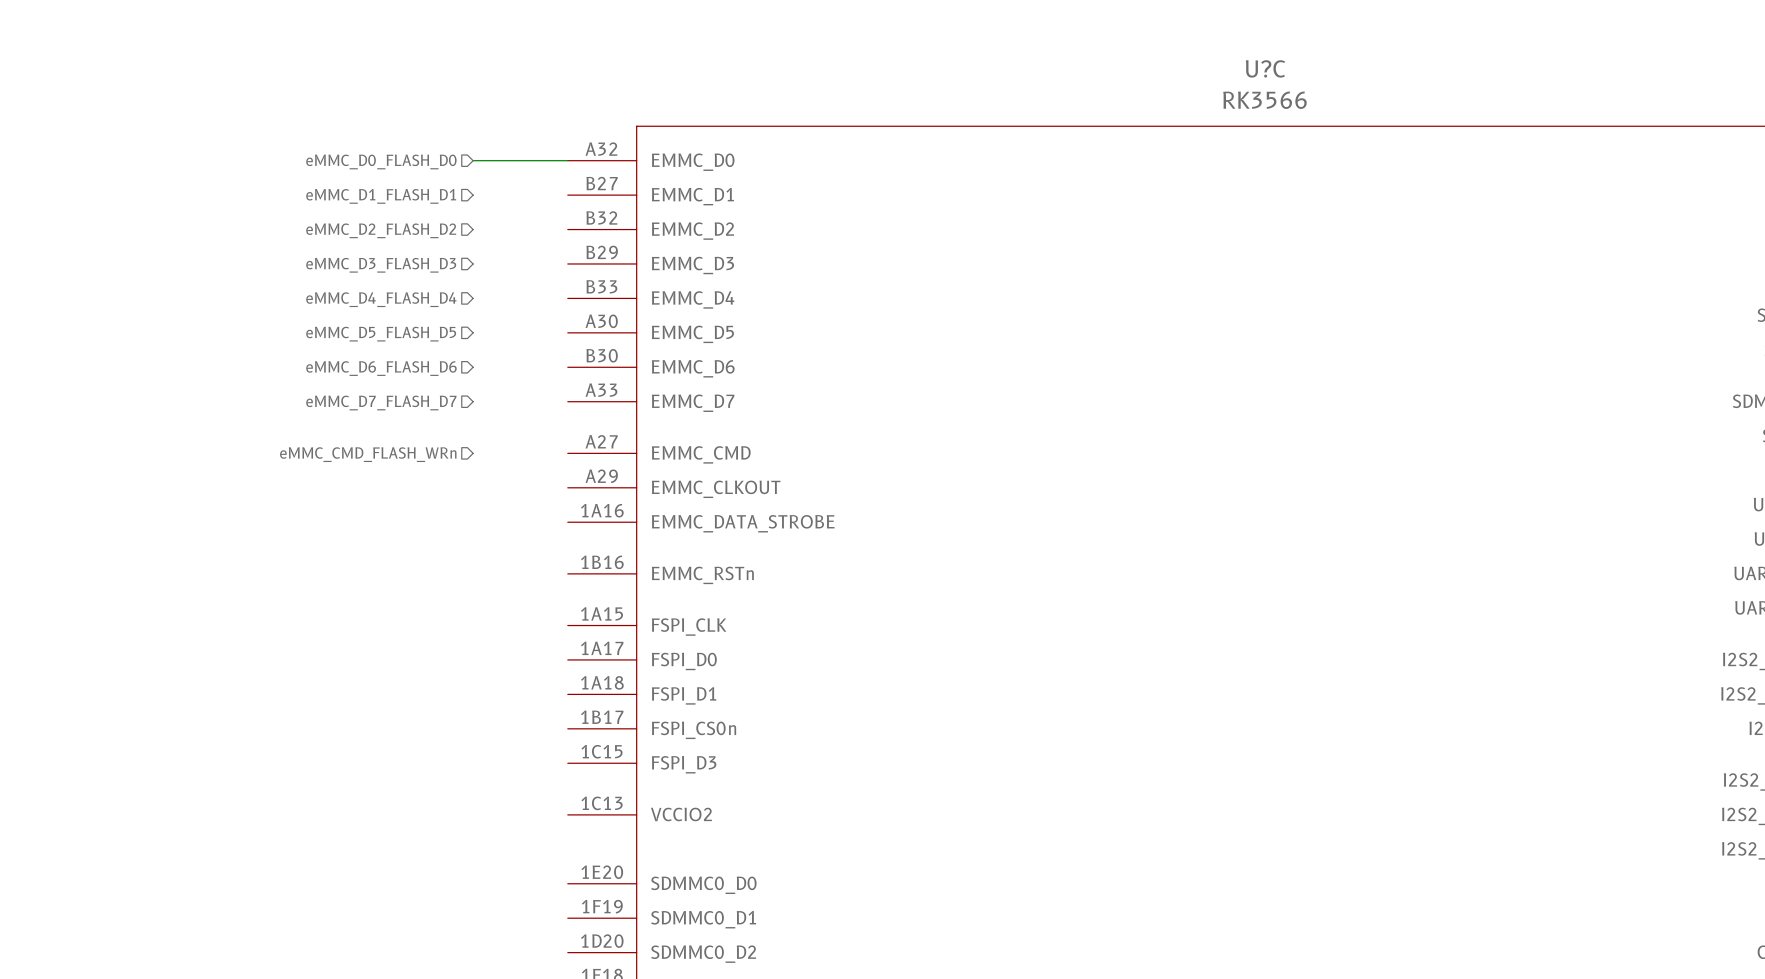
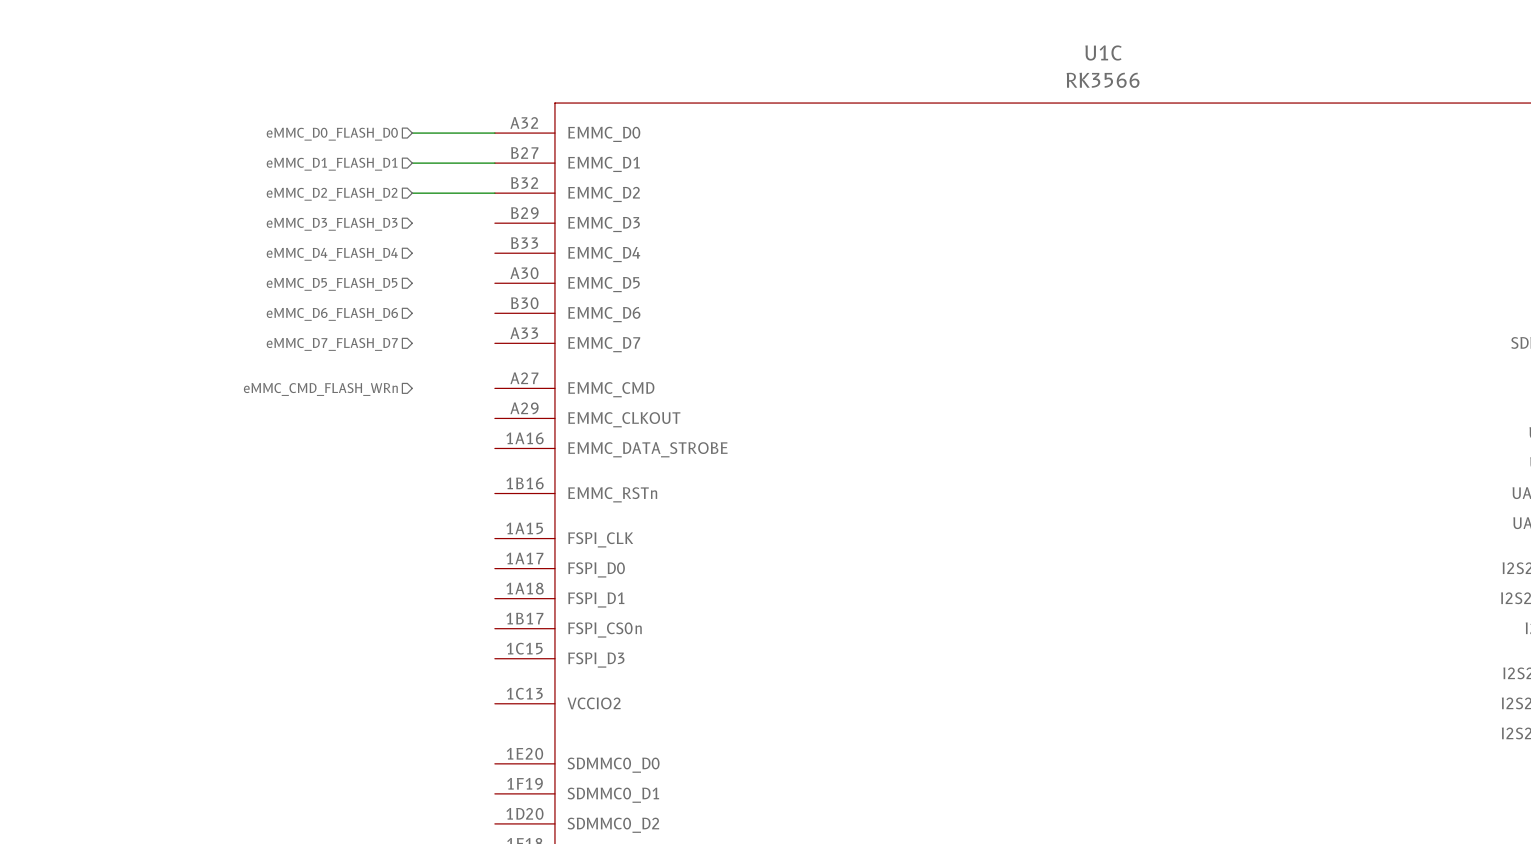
U?C name: U?C (1265, 68) -> U1C (1103, 52)
wire: none -> (412, 163) (494, 163)
wire: none -> (412, 193) (494, 193)

